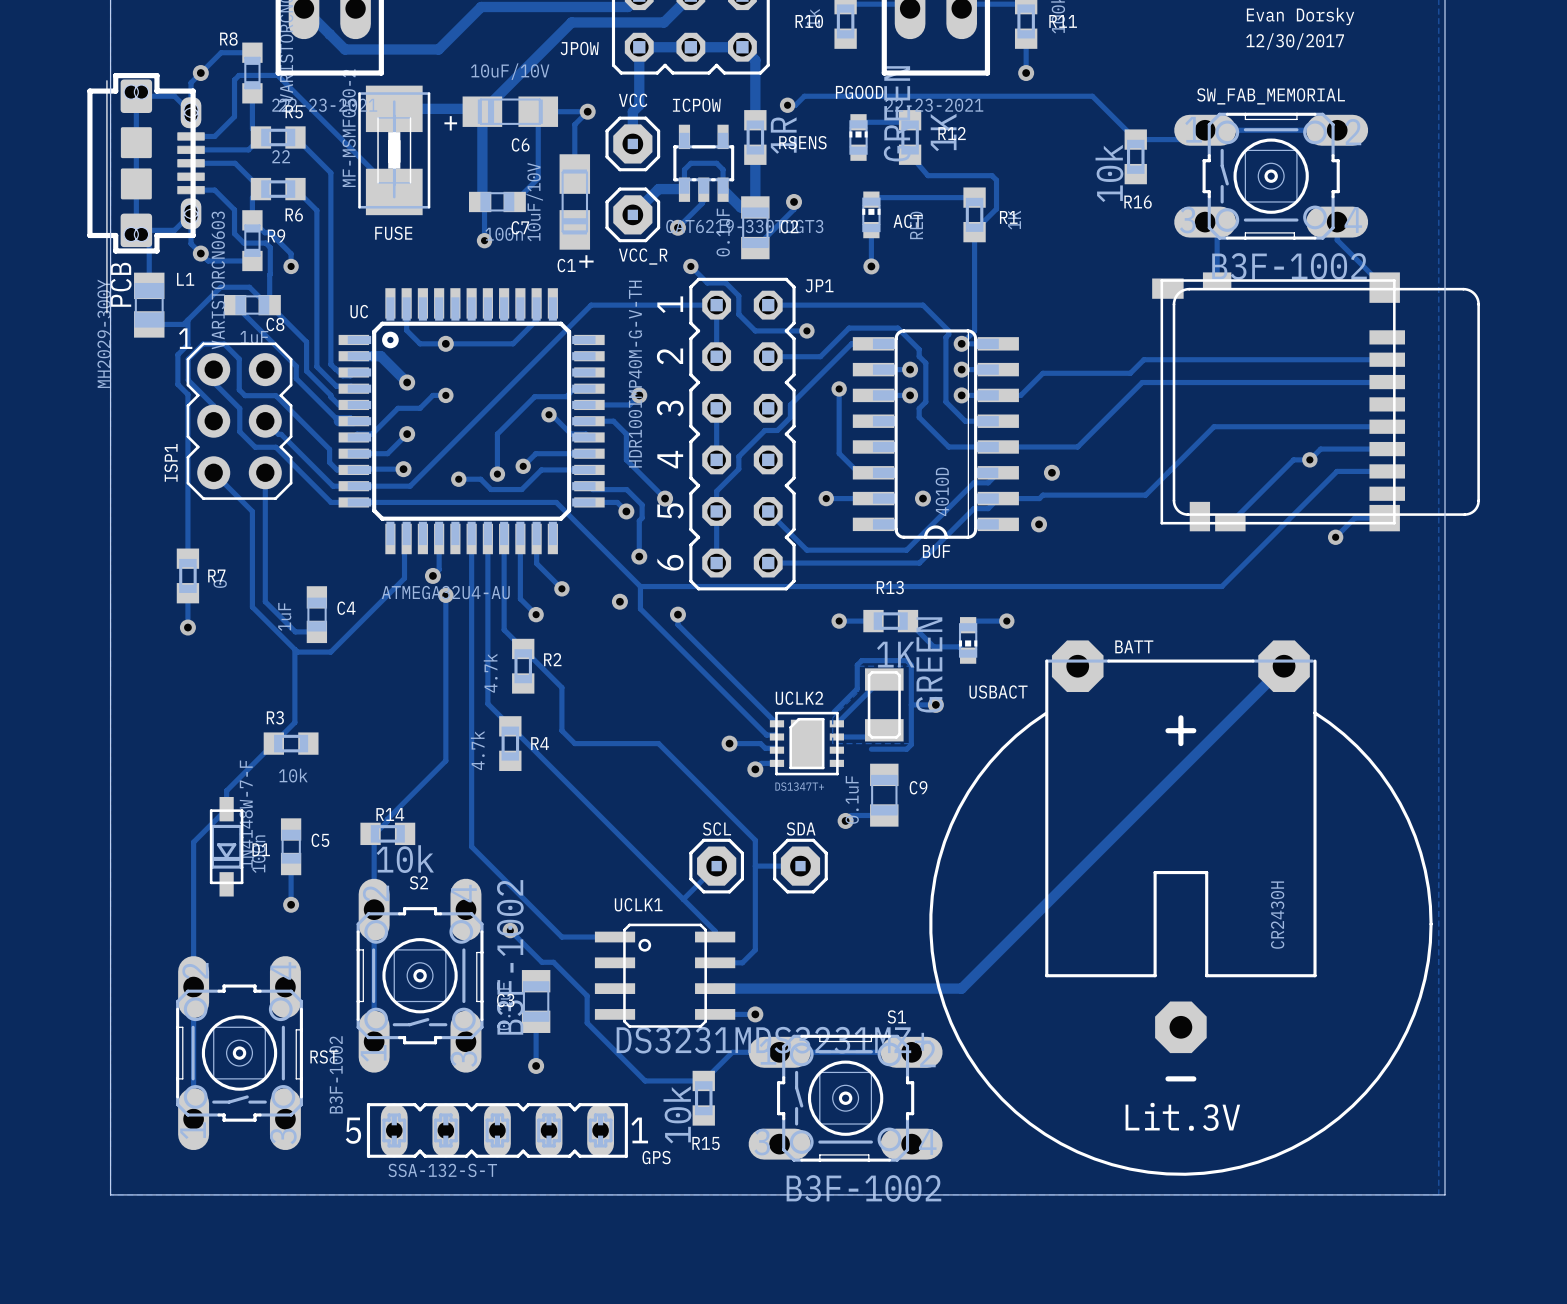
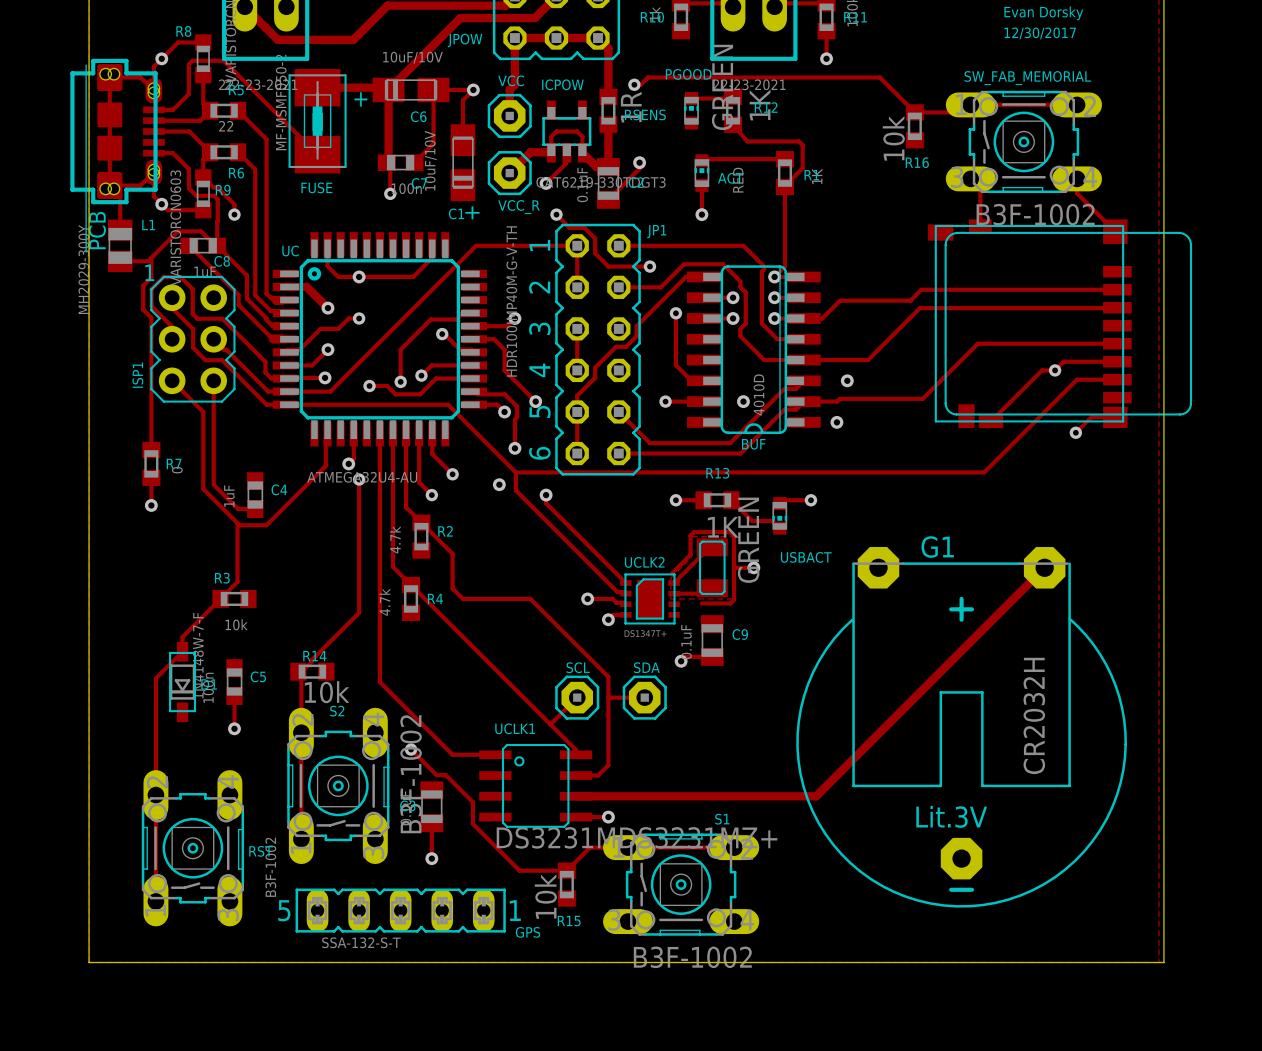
track: (1284, 666) (961, 988) -> (1044, 567) (816, 796) (774, 796)
G1: none -> CR2032H (961, 727)
BATT: CR2430H (1180, 908) -> none

